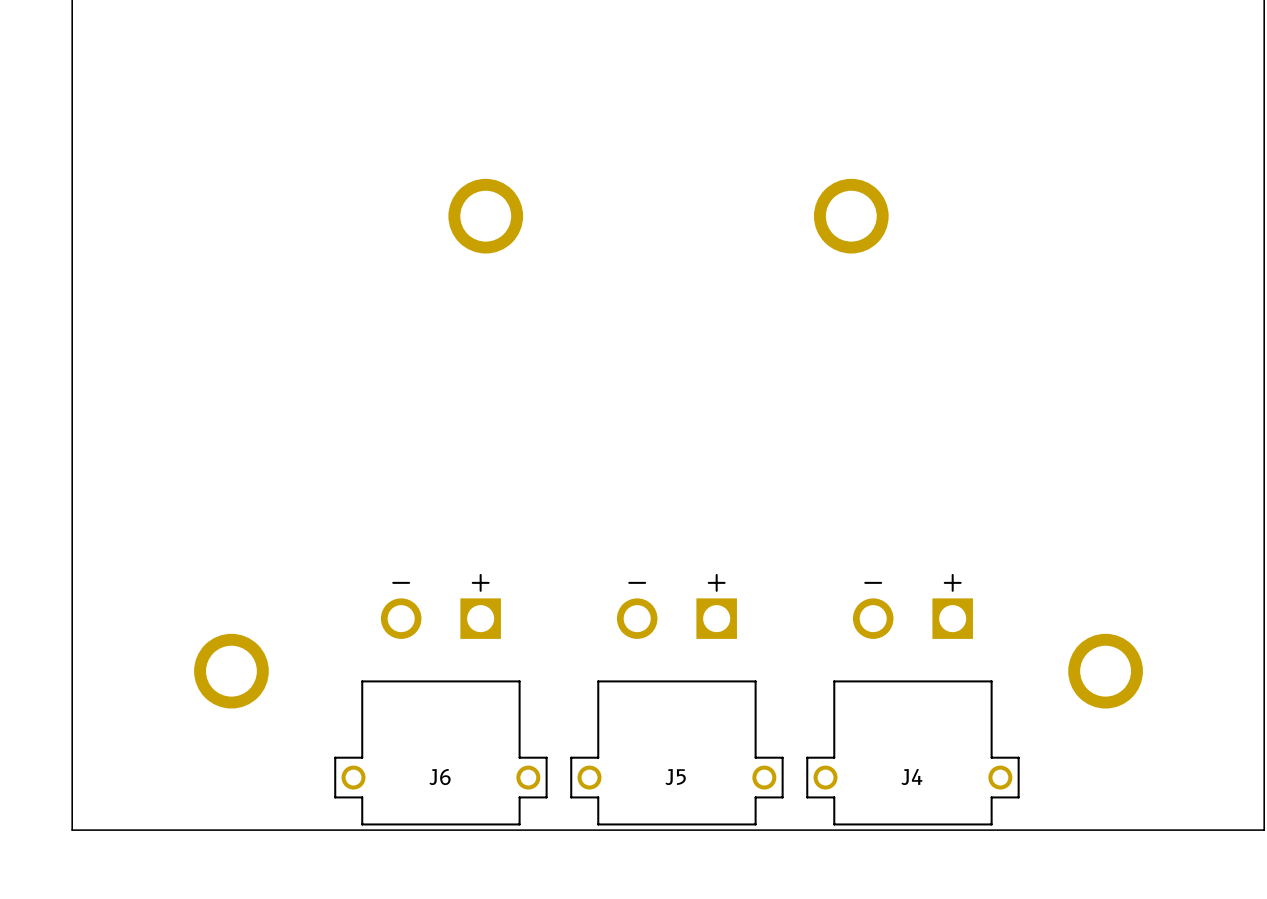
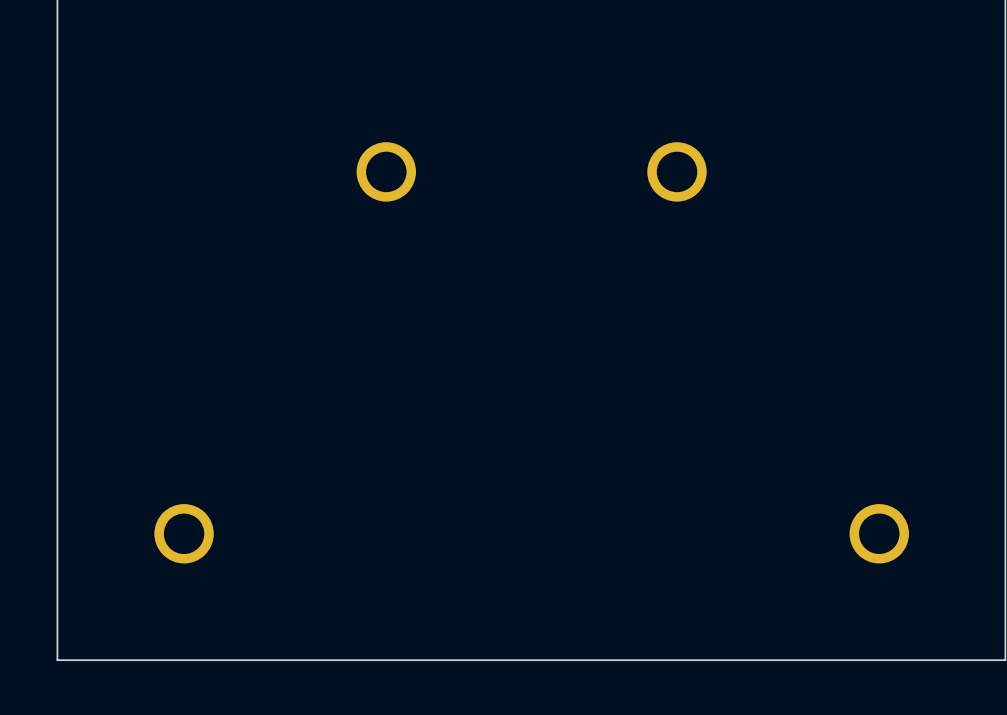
J6: (440, 699) -> none
J5: (676, 699) -> none
J4: (912, 699) -> none

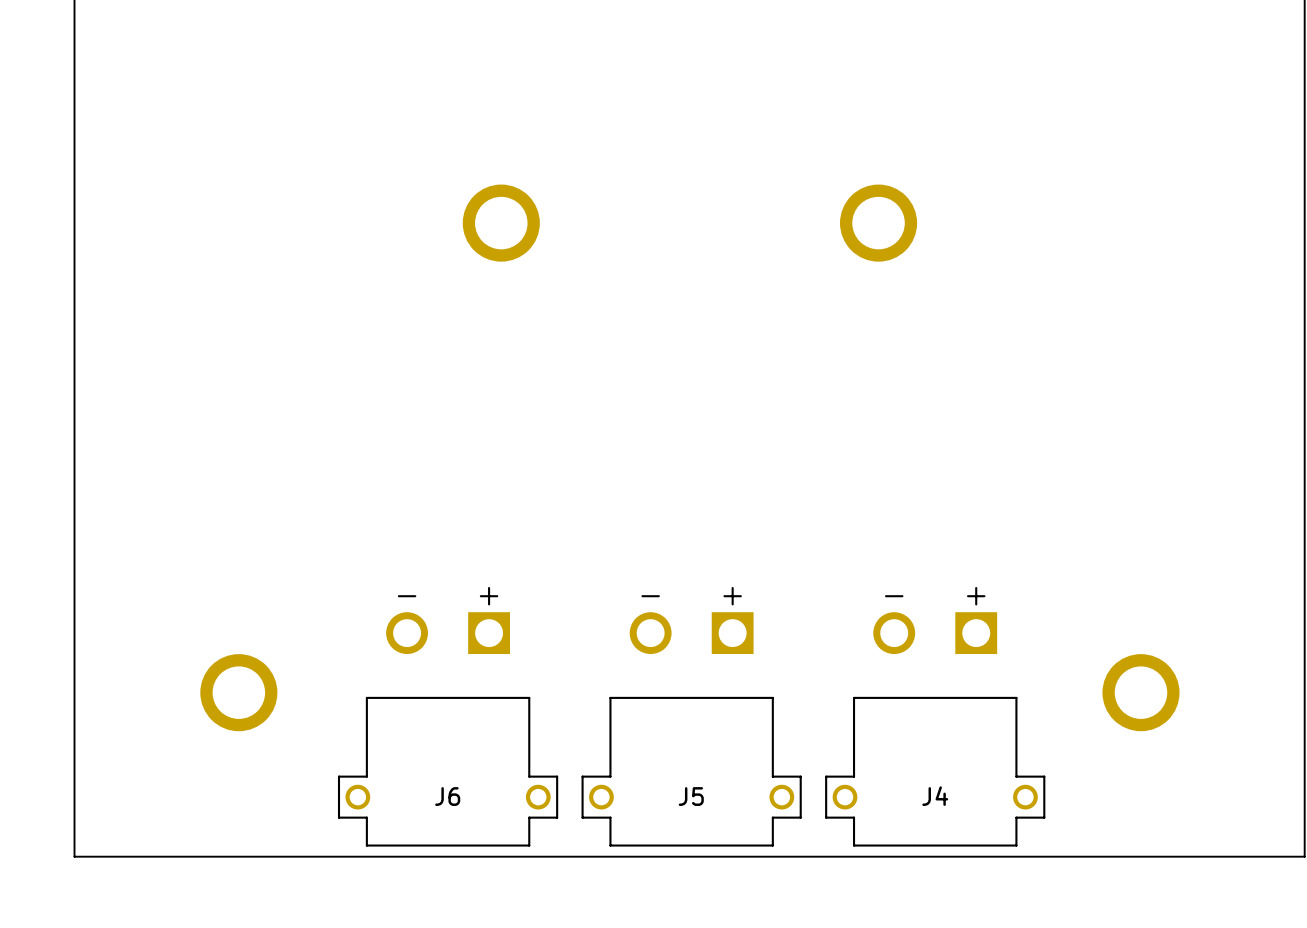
J6: none -> (448, 716)
J5: none -> (691, 716)
J4: none -> (935, 716)

